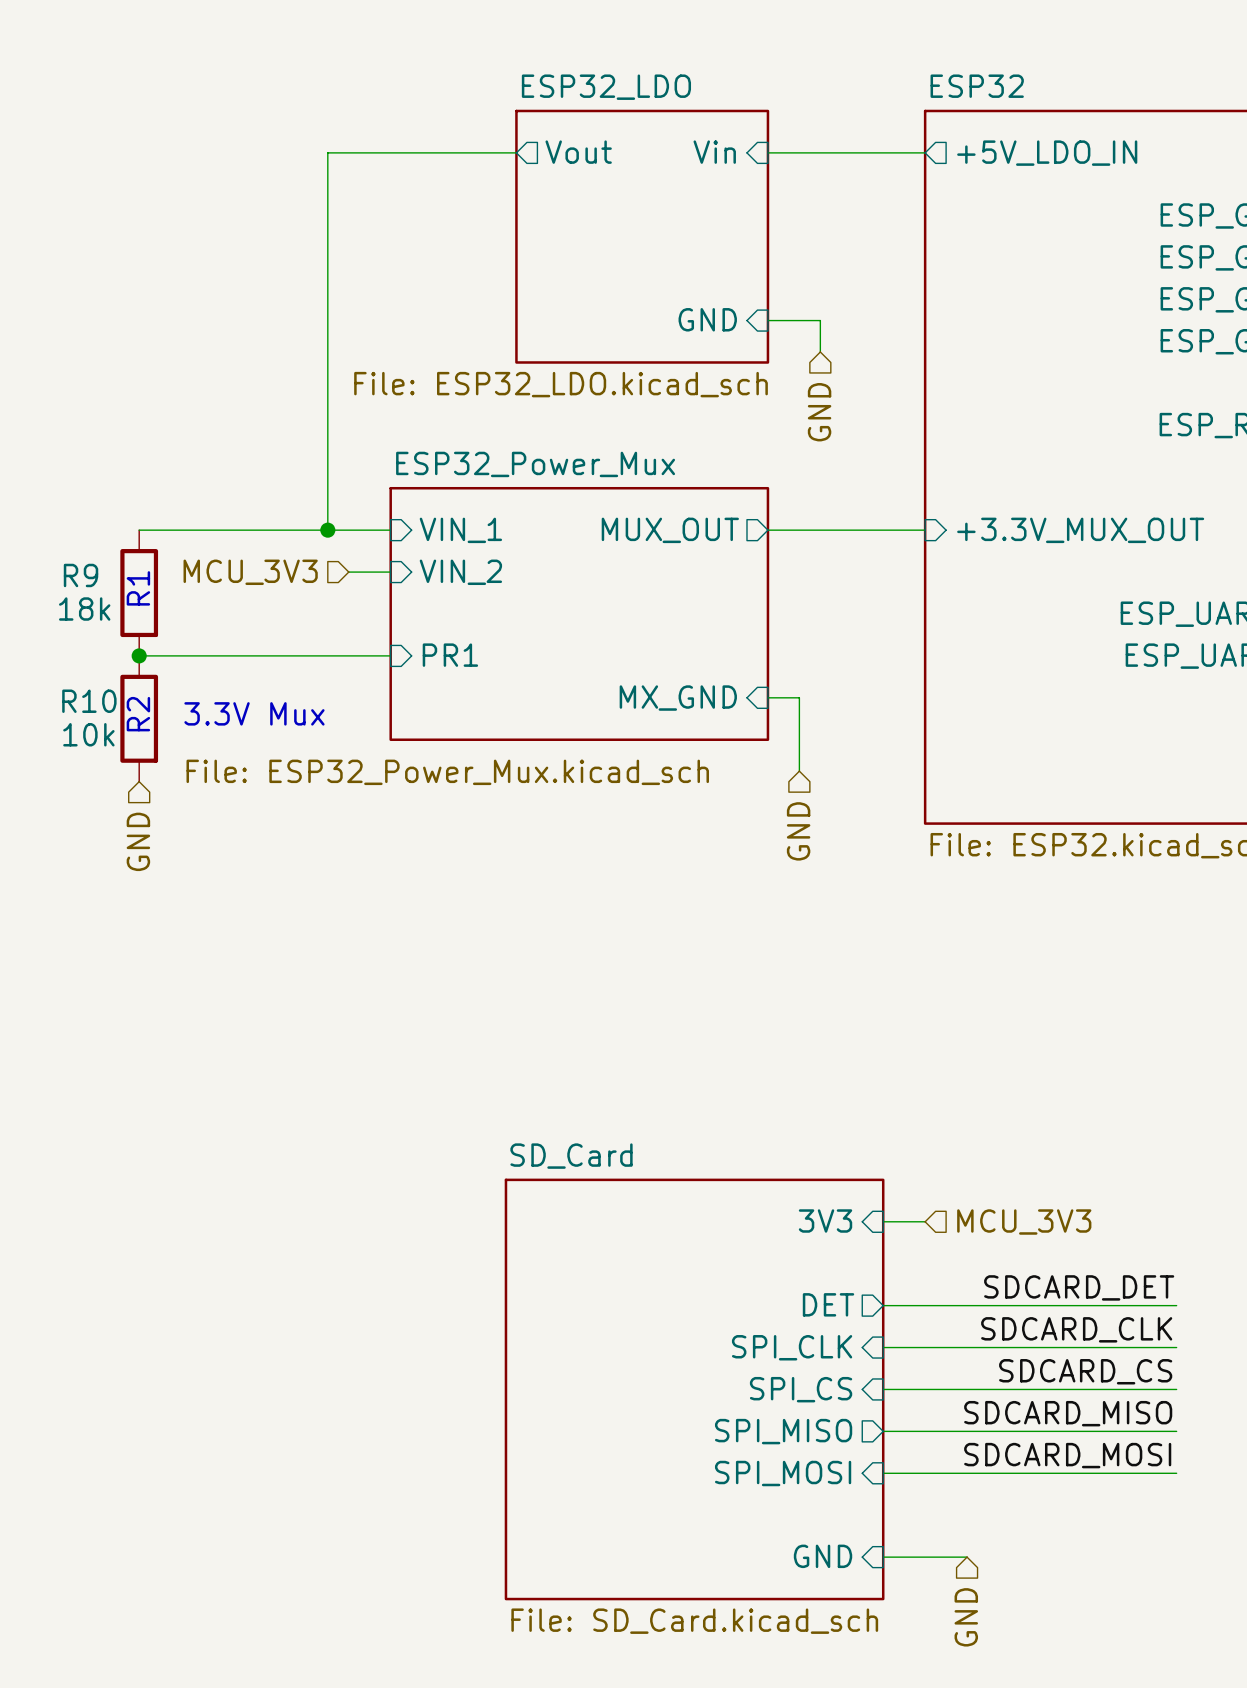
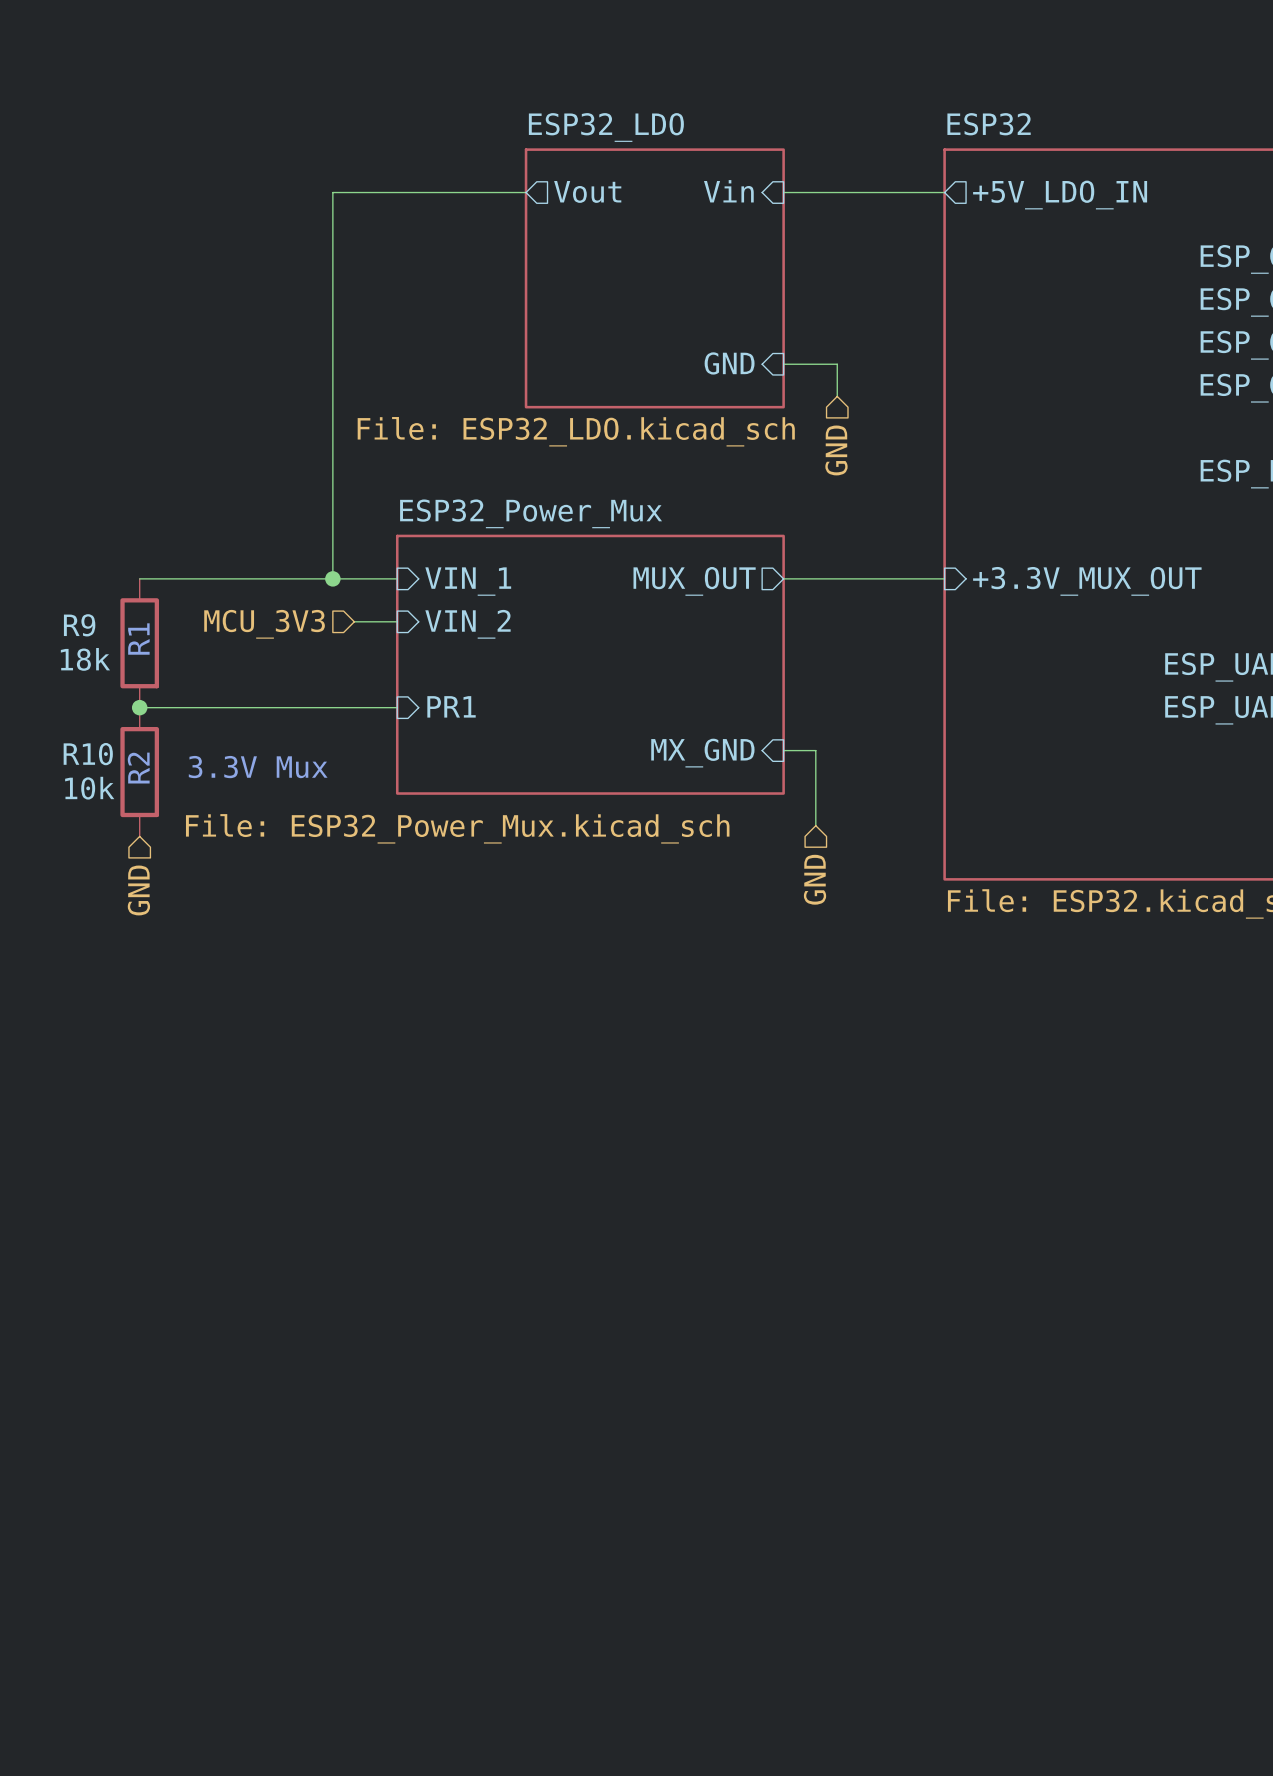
sheet pin: 3V3 (825, 1221) -> none
wire: (883, 1221) (925, 1221) -> none
hierarchical label: MCU_3V3 (1024, 1222) -> none
label: SDCARD_DET (1079, 1287) -> none
sheet pin: DET (828, 1304) -> none
wire: (883, 1305) (1176, 1305) -> none
label: SDCARD_CLK (1076, 1329) -> none
sheet pin: SPI_CLK (792, 1347) -> none
wire: (883, 1347) (1176, 1347) -> none
label: SDCARD_CS (1085, 1371) -> none
sheet SD_Card: File: SD_Card.kicad_sch (694, 1389) -> none
sheet pin: SPI_CS (801, 1389) -> none
wire: (883, 1389) (1176, 1389) -> none
label: SDCARD_MISO (1068, 1413) -> none
sheet pin: SPI_MISO (783, 1431) -> none
wire: (883, 1431) (1176, 1431) -> none
label: SDCARD_MOSI (1067, 1455) -> none
sheet pin: SPI_MOSI (783, 1473) -> none
wire: (883, 1473) (1176, 1473) -> none
sheet pin: GND (823, 1556) -> none
wire: (883, 1557) (967, 1557) -> none
hierarchical label: GND (966, 1617) -> none

